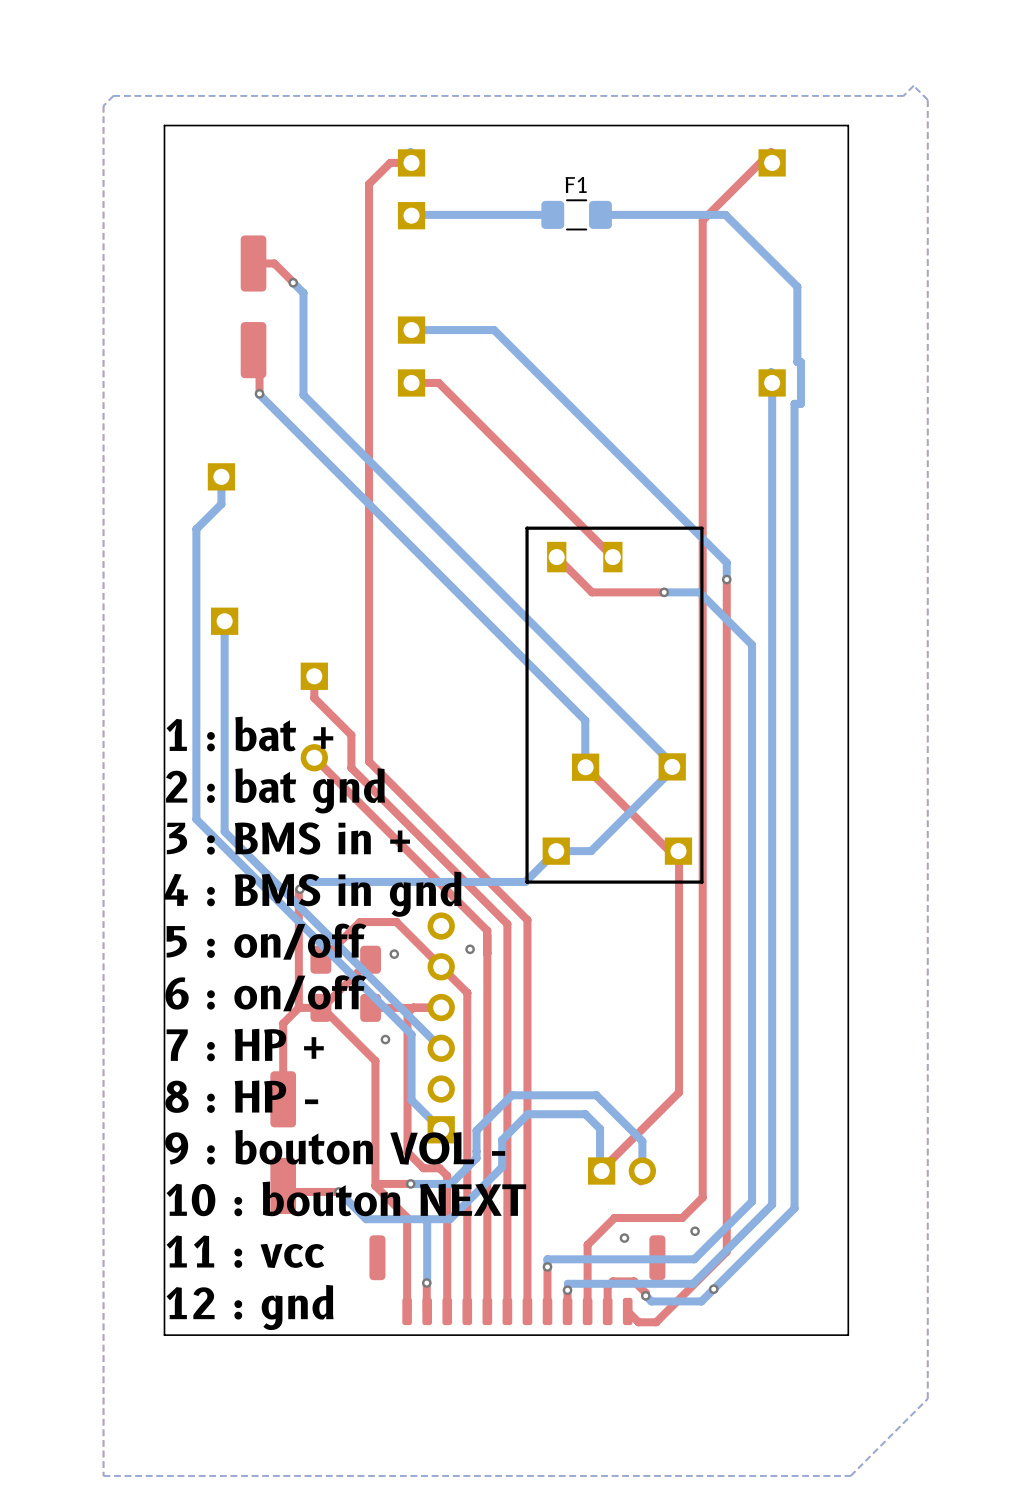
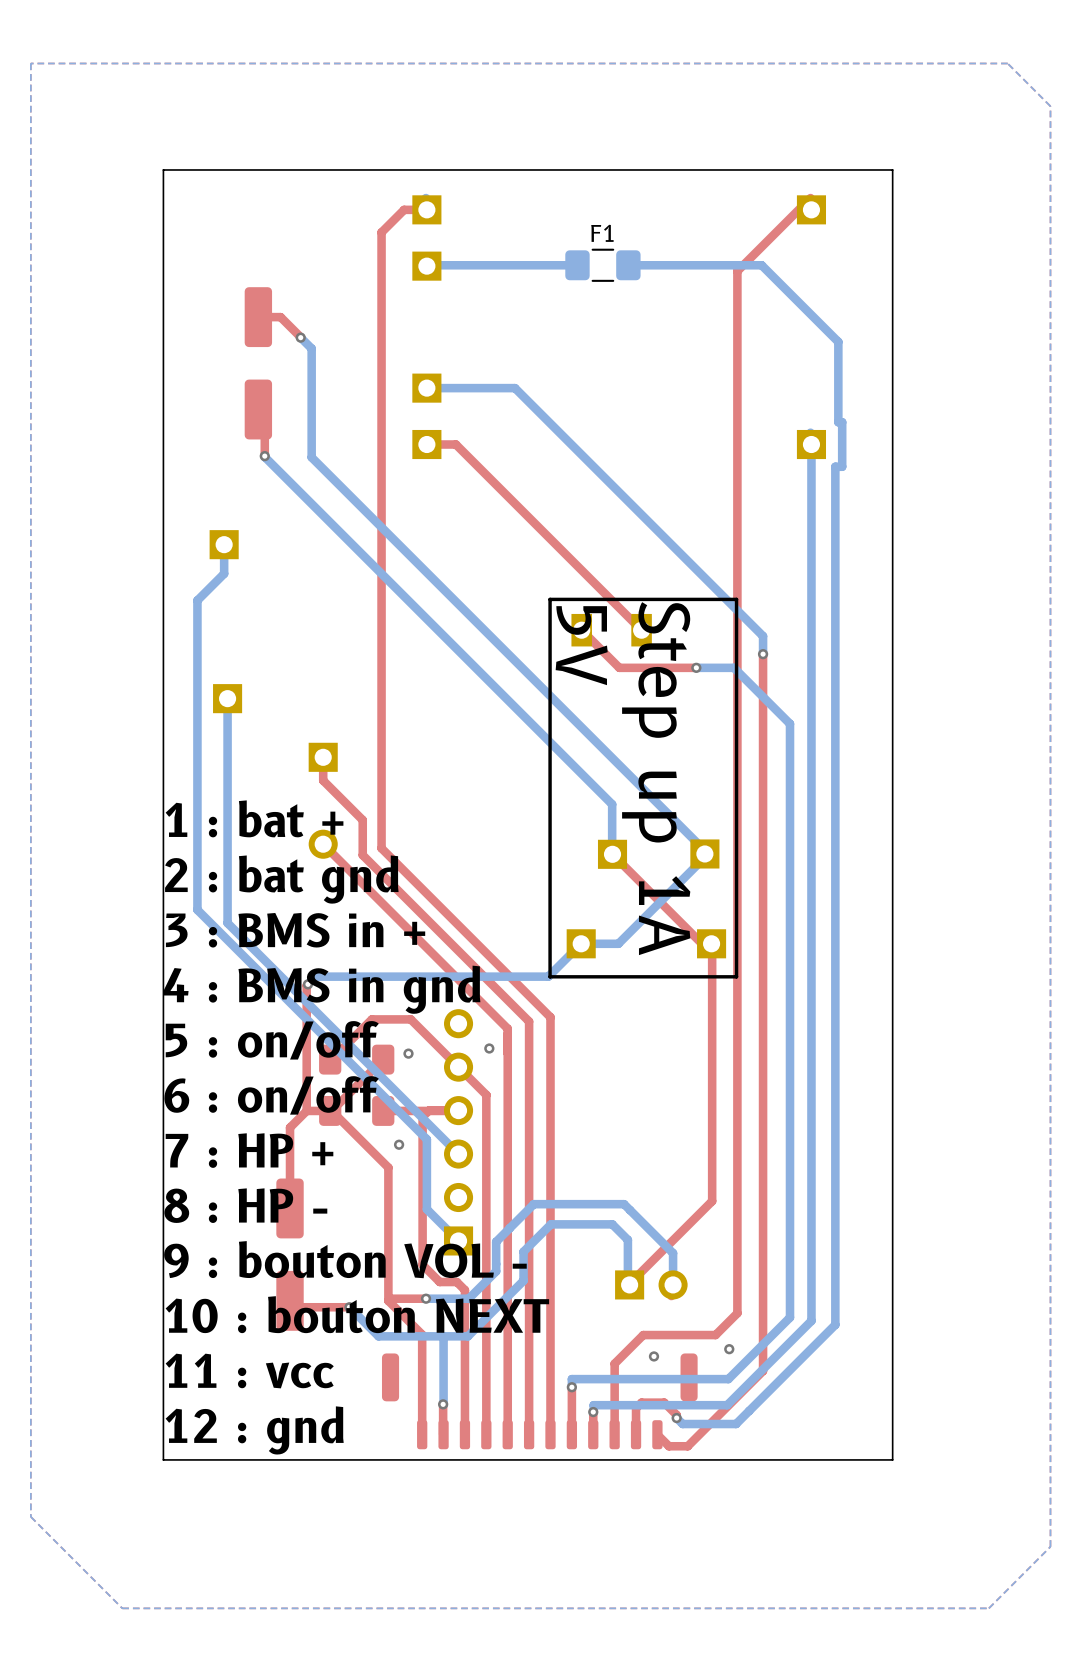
bottom zone outline: (913, 85) (927, 99) (927, 1398) (850, 1475) (103, 1475) (103, 105) (113, 95) (903, 95) (913, 85) -> (1007, 63) (1050, 106) (1050, 1546) (988, 1608) (122, 1608) (30, 1516) (30, 63) (1007, 63)
text: none -> 5V (581, 645)
text: none -> Step up 1A (656, 778)
via: (713, 1289) -> none

